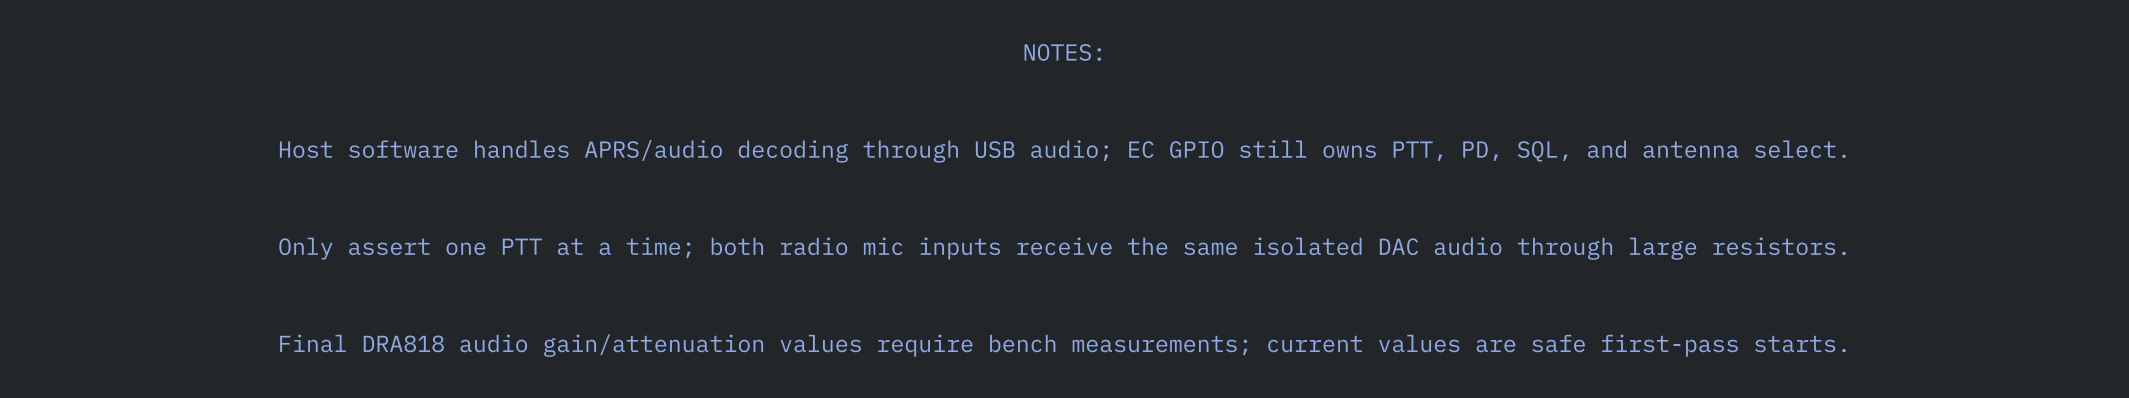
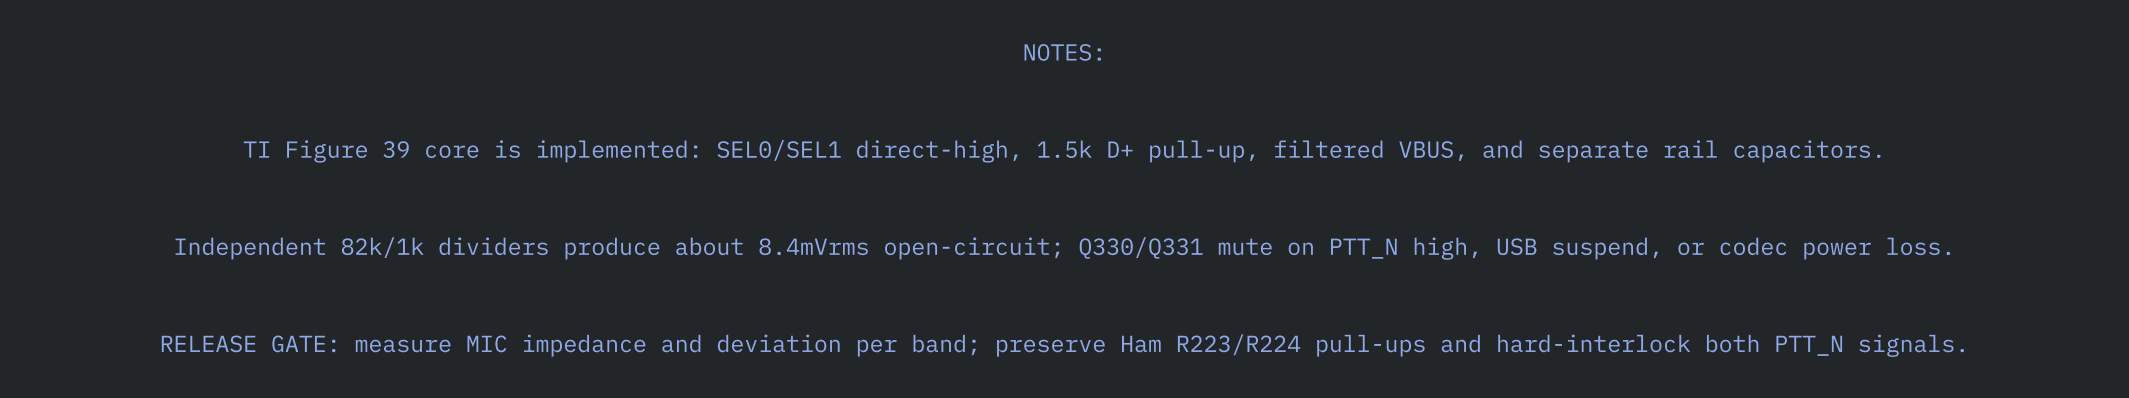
text: Host software handles APRS/audio decoding through USB audio; EC GPIO still owns PTT, PD, SQL, and antenna select. (1062, 151) -> TI Figure 39 core is implemented: SEL0/SEL1 direct-high, 1.5k D+ pull-up, filtered VBUS, and separate rail capacitors. (1062, 151)
text: Only assert one PTT at a time; both radio mic inputs receive the same isolated DAC audio through large resistors. (1062, 248) -> Independent 82k/1k dividers produce about 8.4mVrms open-circuit; Q330/Q331 mute on PTT_N high, USB suspend, or codec power loss. (1062, 248)
text: Final DRA818 audio gain/attenuation values require bench measurements; current values are safe first-pass starts. (1062, 345) -> RELEASE GATE: measure MIC impedance and deviation per band; preserve Ham R223/R224 pull-ups and hard-interlock both PTT_N signals. (1062, 345)

